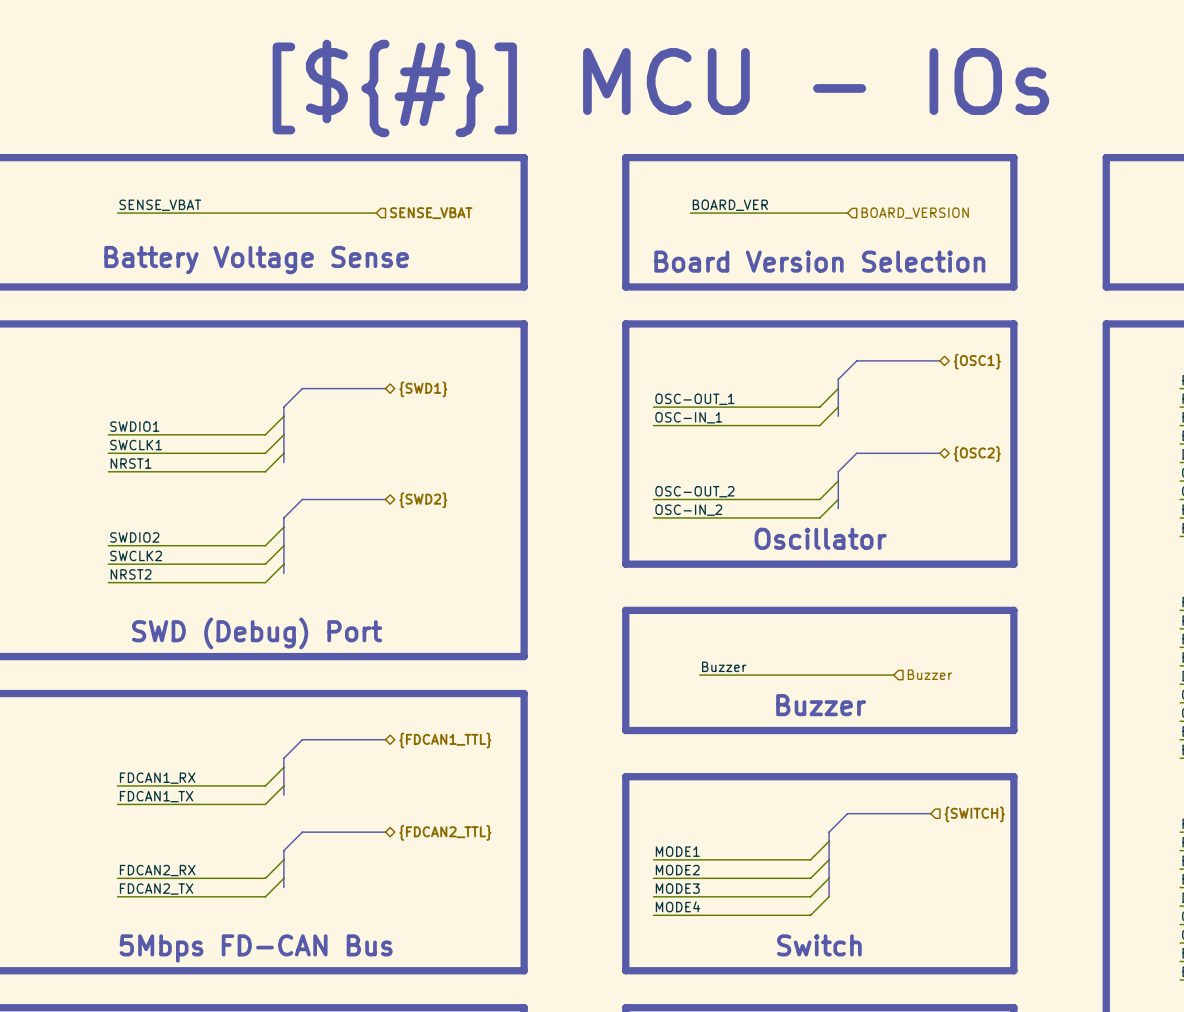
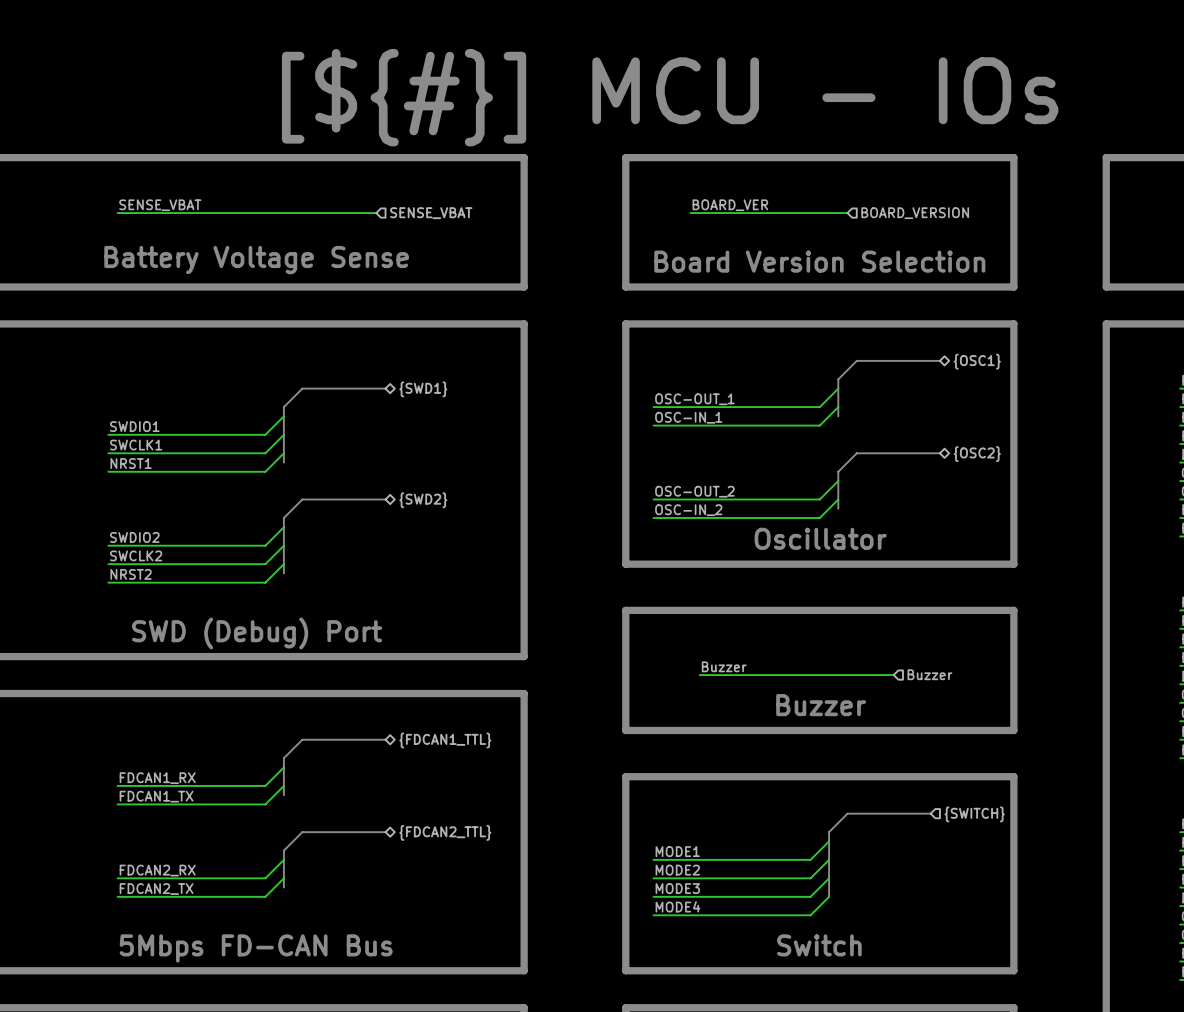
text position: [${#}] MCU - IOs (660, 88) -> [${#}] MCU - IOs (670, 97)

